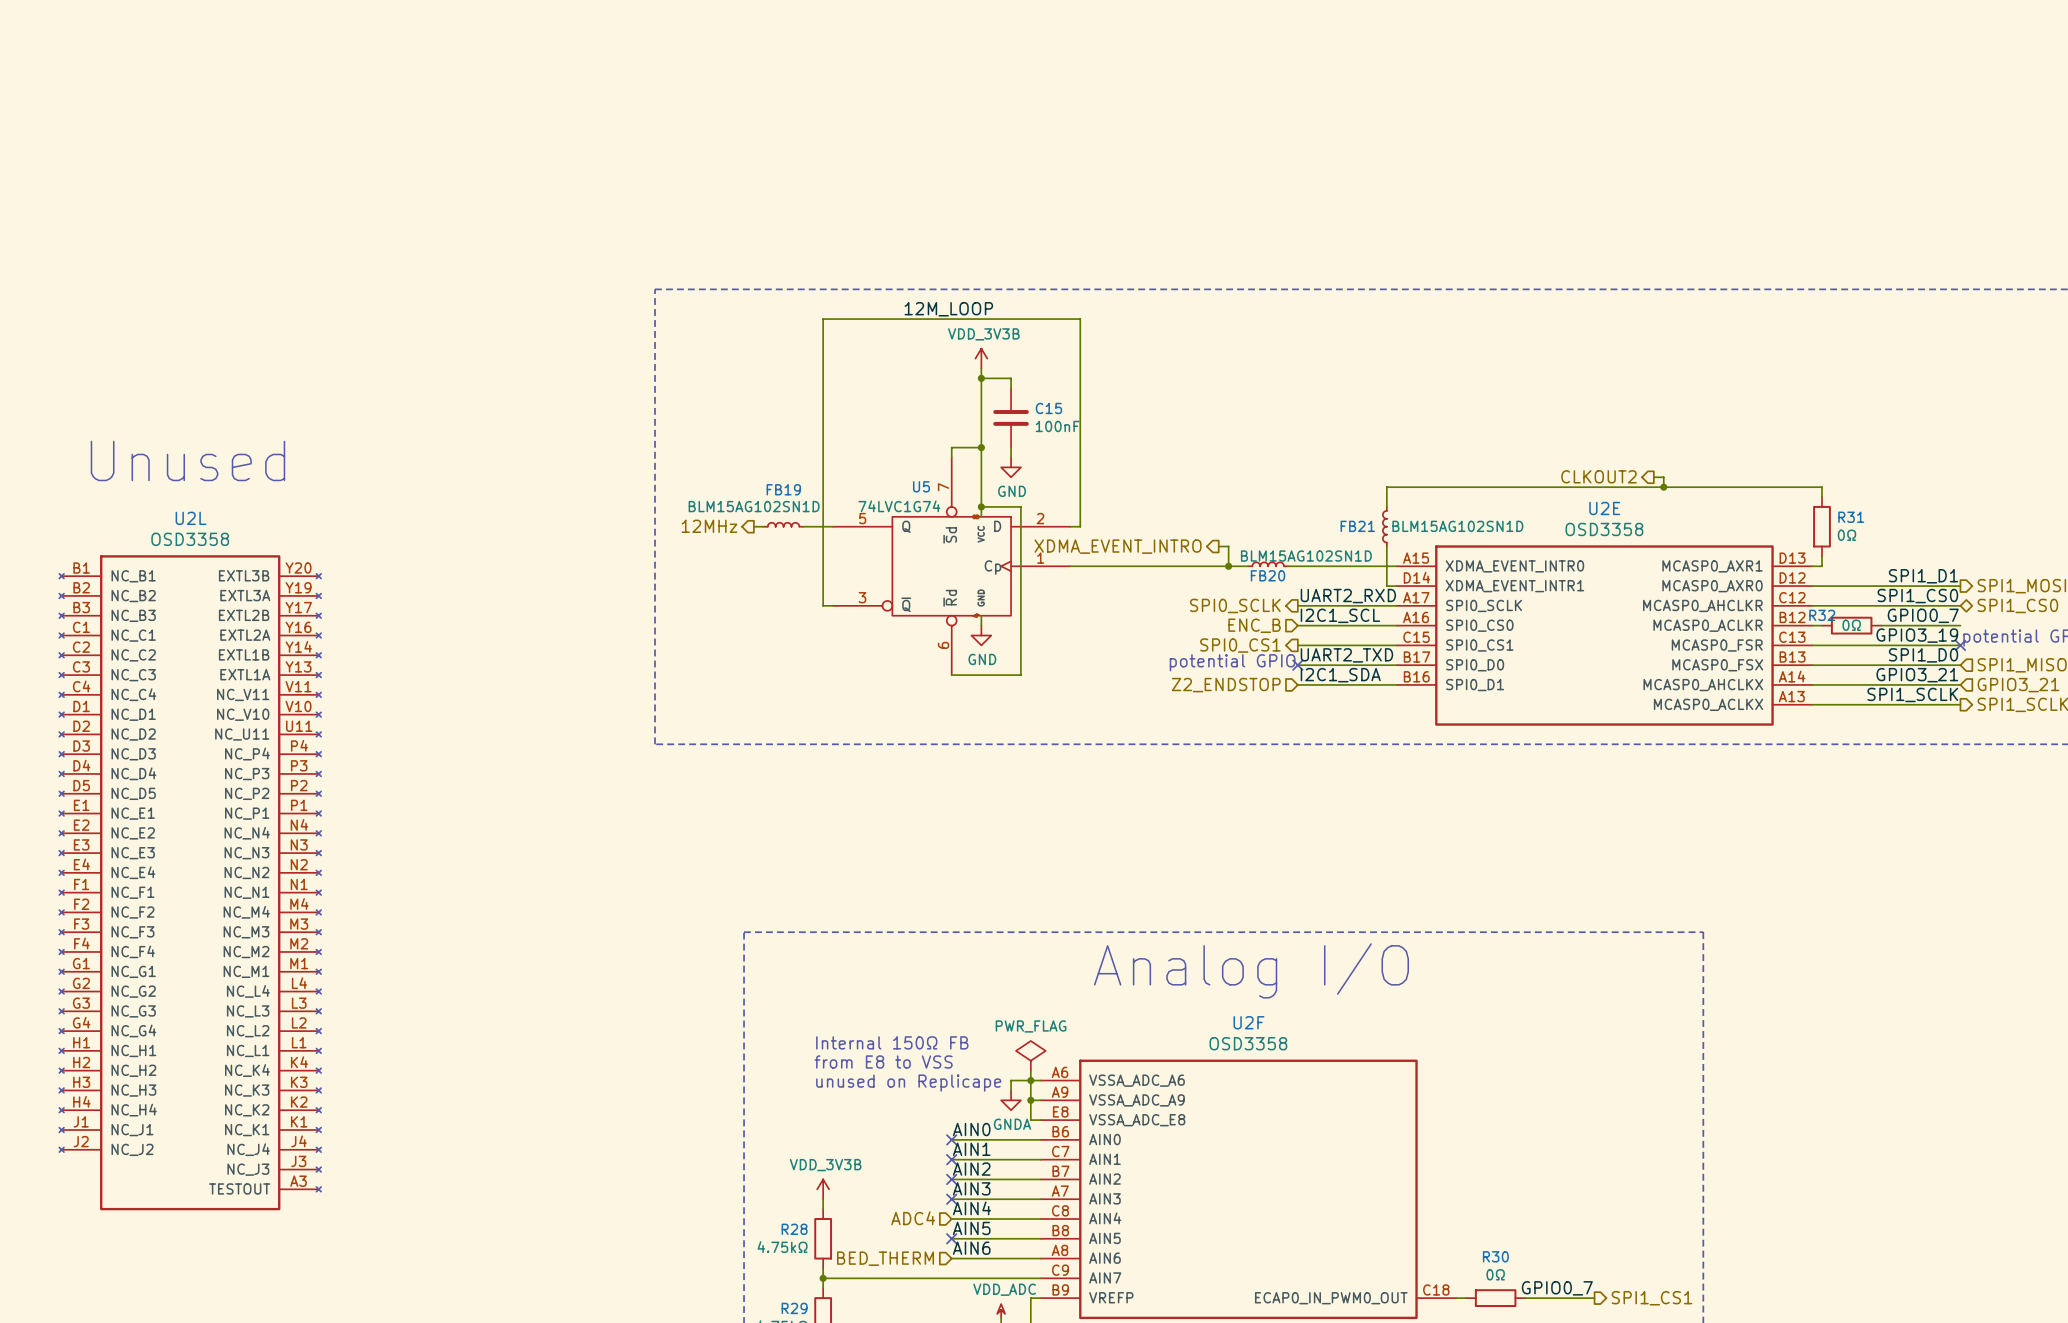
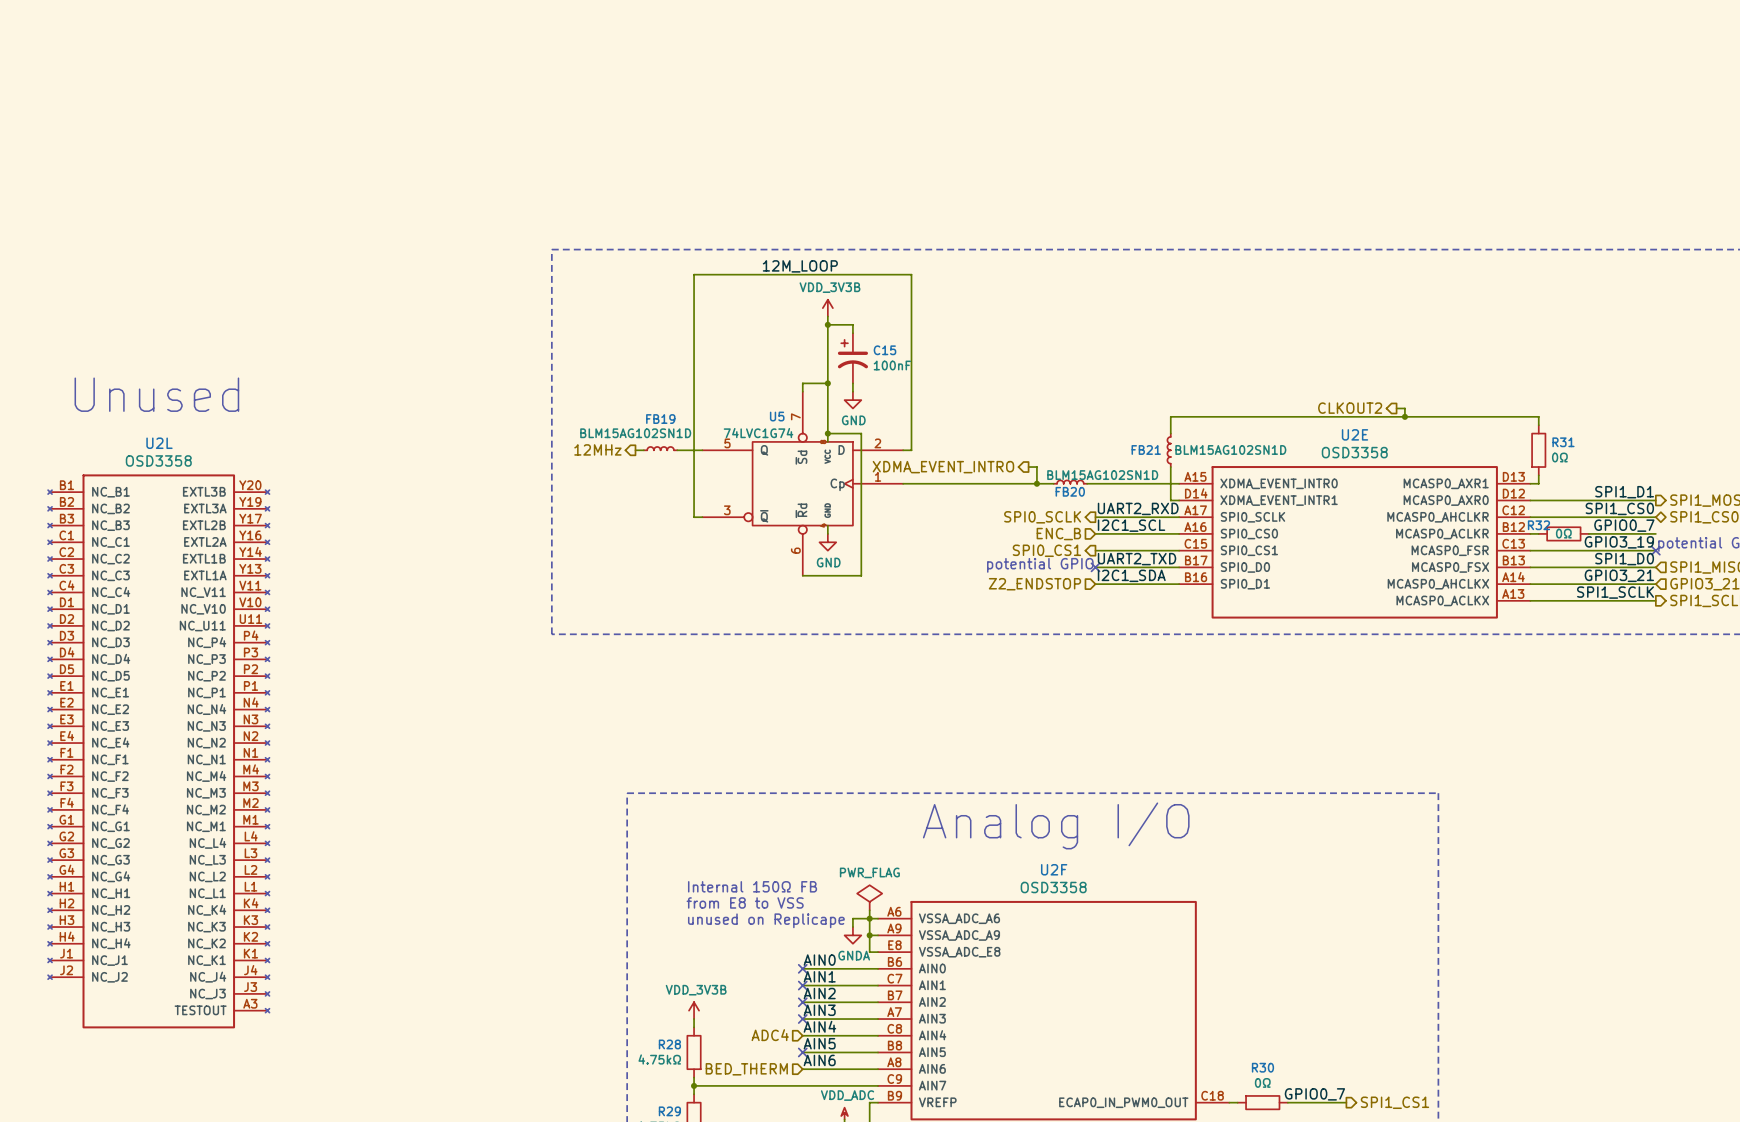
C15 symbol: [993, 388, 1029, 448] -> [837, 333, 869, 384]

